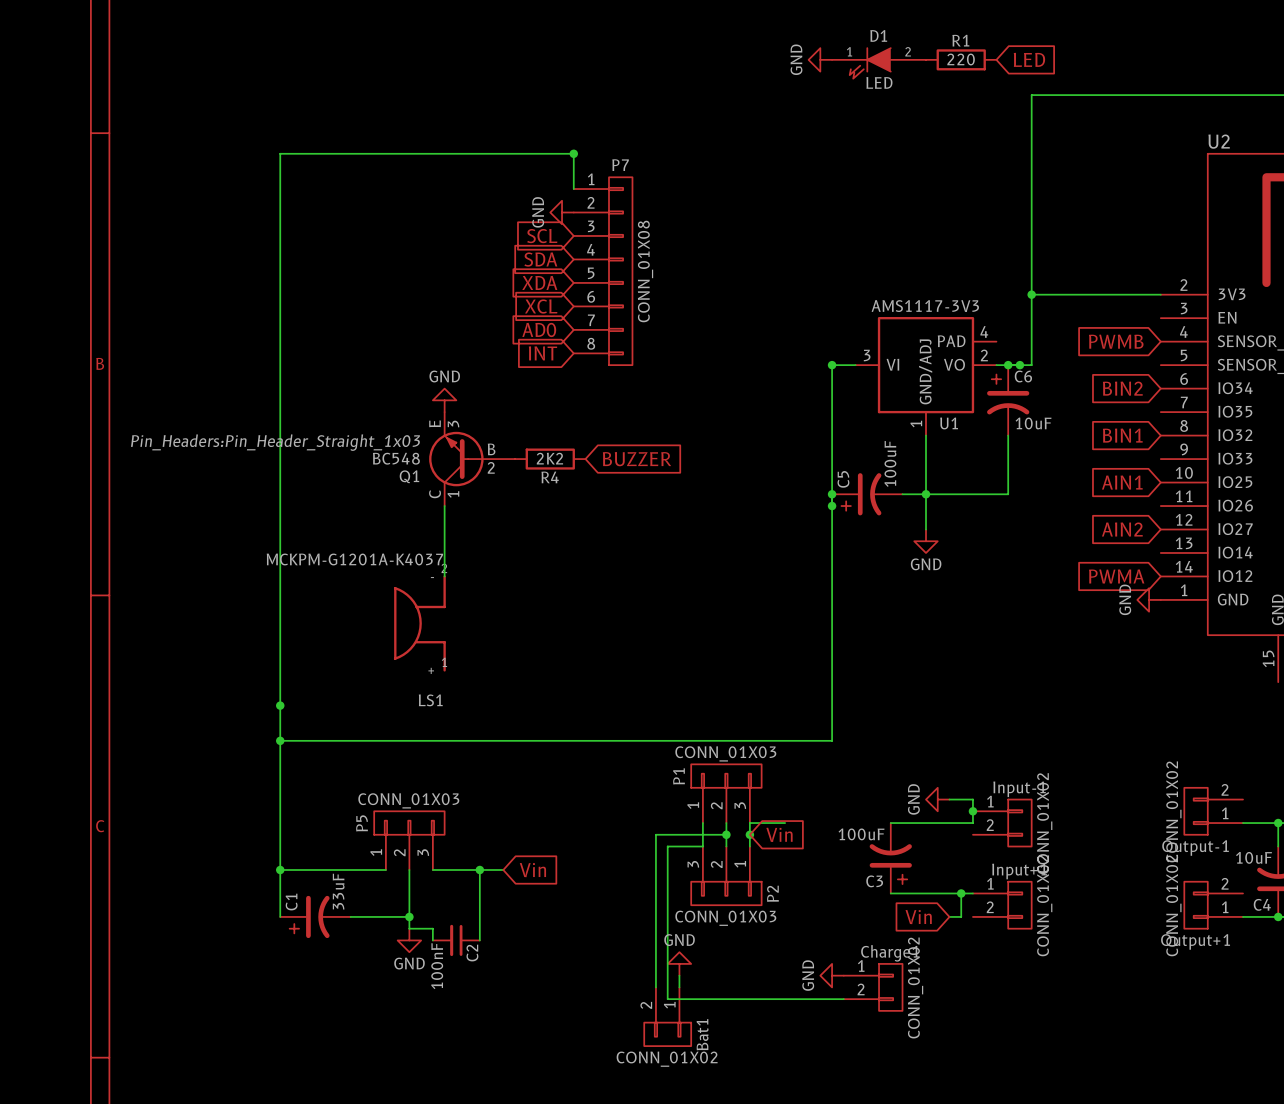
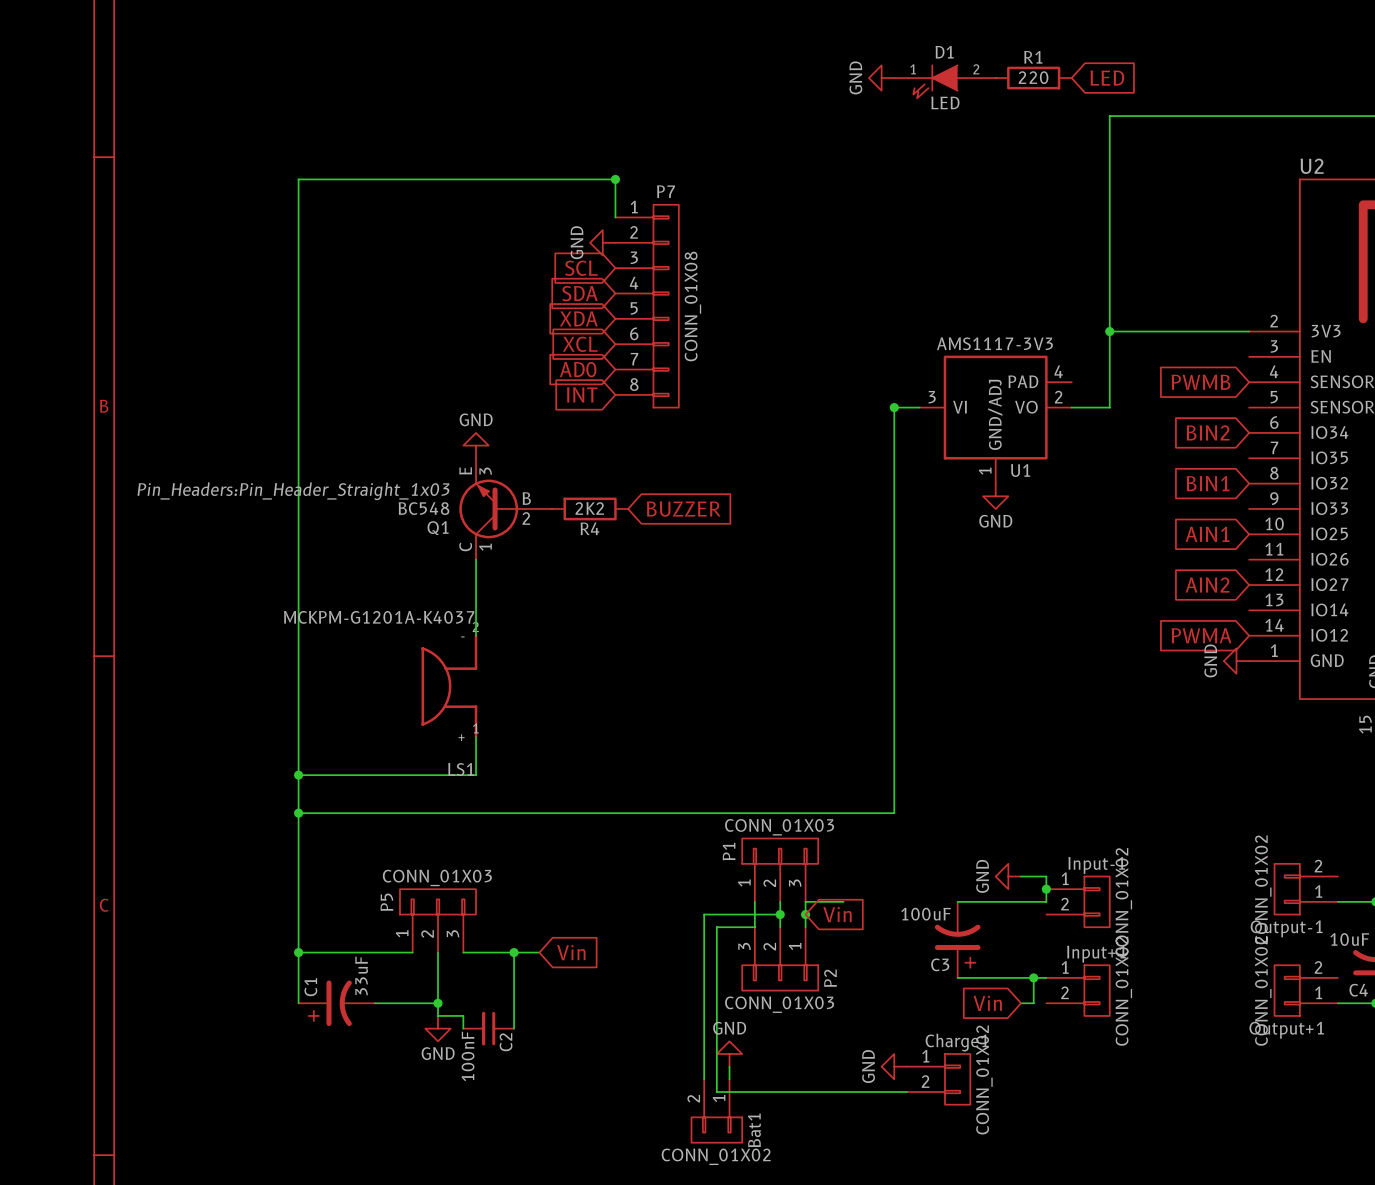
junction: (1008, 365) -> none
junction: (1019, 365) -> none
C6: 10uF (1008, 400) -> none
wire: (926, 435) (926, 529) -> none
wire: (1008, 435) (1008, 494) (902, 494) -> none
junction: (832, 494) -> none
C5: 100uF (867, 494) -> none
junction: (926, 494) -> none
junction: (832, 506) -> none
power symbol position: GND (926, 541) -> GND (995, 496)
wire: none -> (476, 737) (476, 775) (298, 775)

